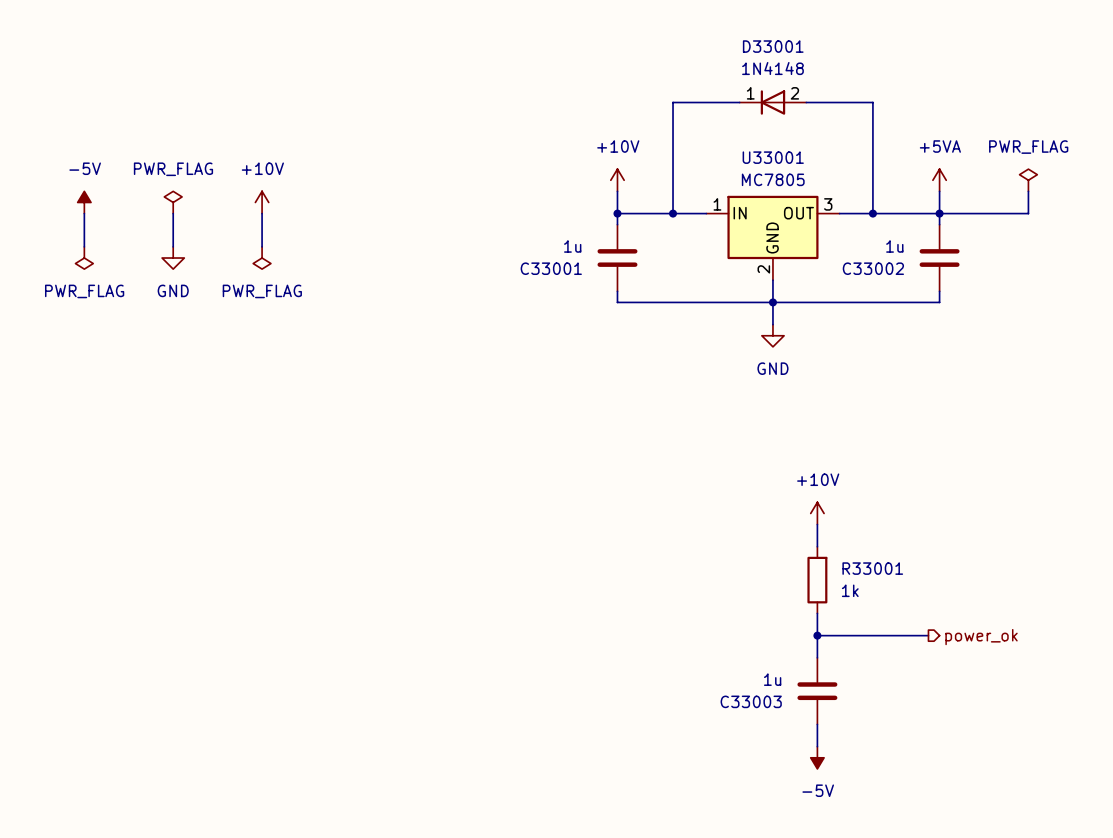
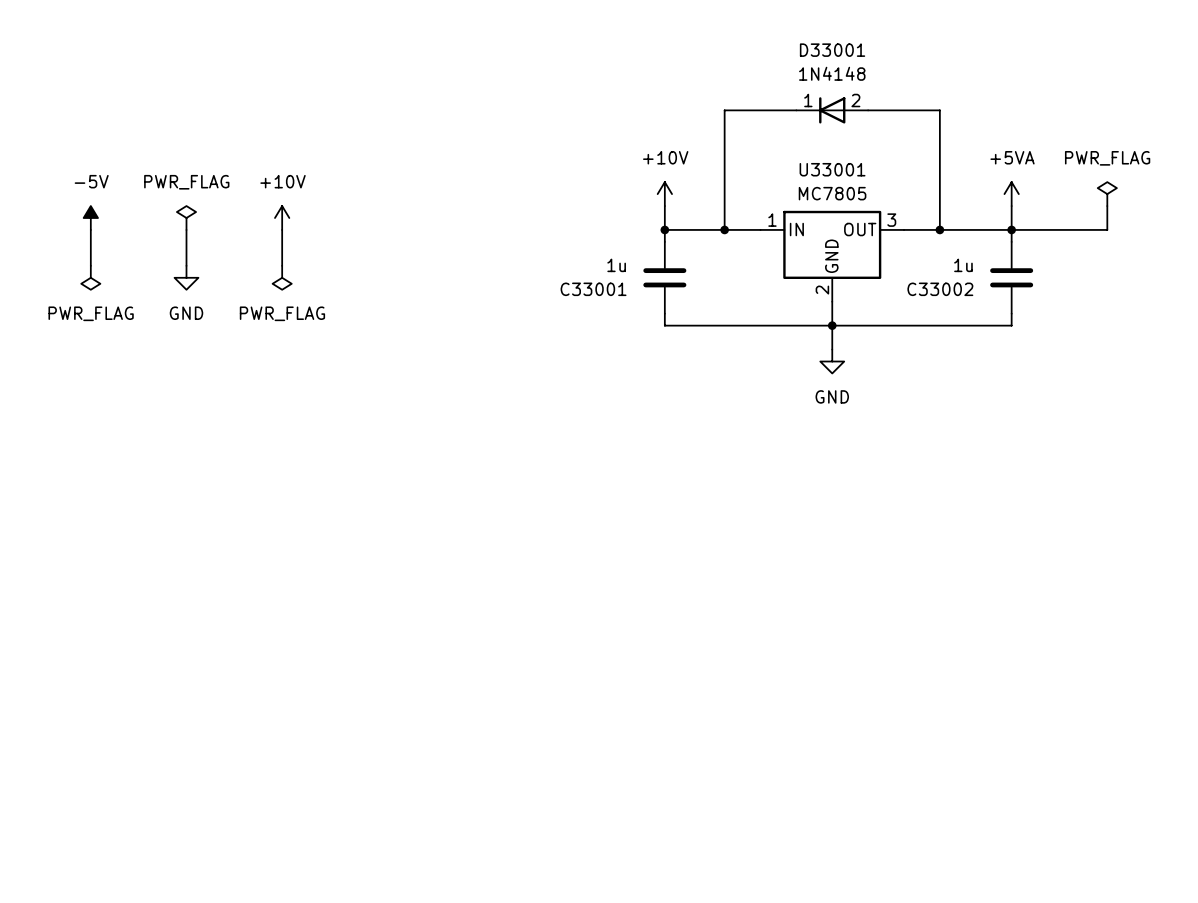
power symbol: +10V (817, 513) -> none
wire: (817, 524) (817, 546) -> none
R33001: 1k (817, 580) -> none
wire: (817, 613) (817, 657) -> none
wire: (817, 635) (928, 635) -> none
junction: (817, 635) -> none
hierarchical label: power_ok (981, 637) -> none
C33003: 1u (817, 691) -> none
wire: (817, 724) (817, 746) -> none
power symbol: -5V (817, 757) -> none

